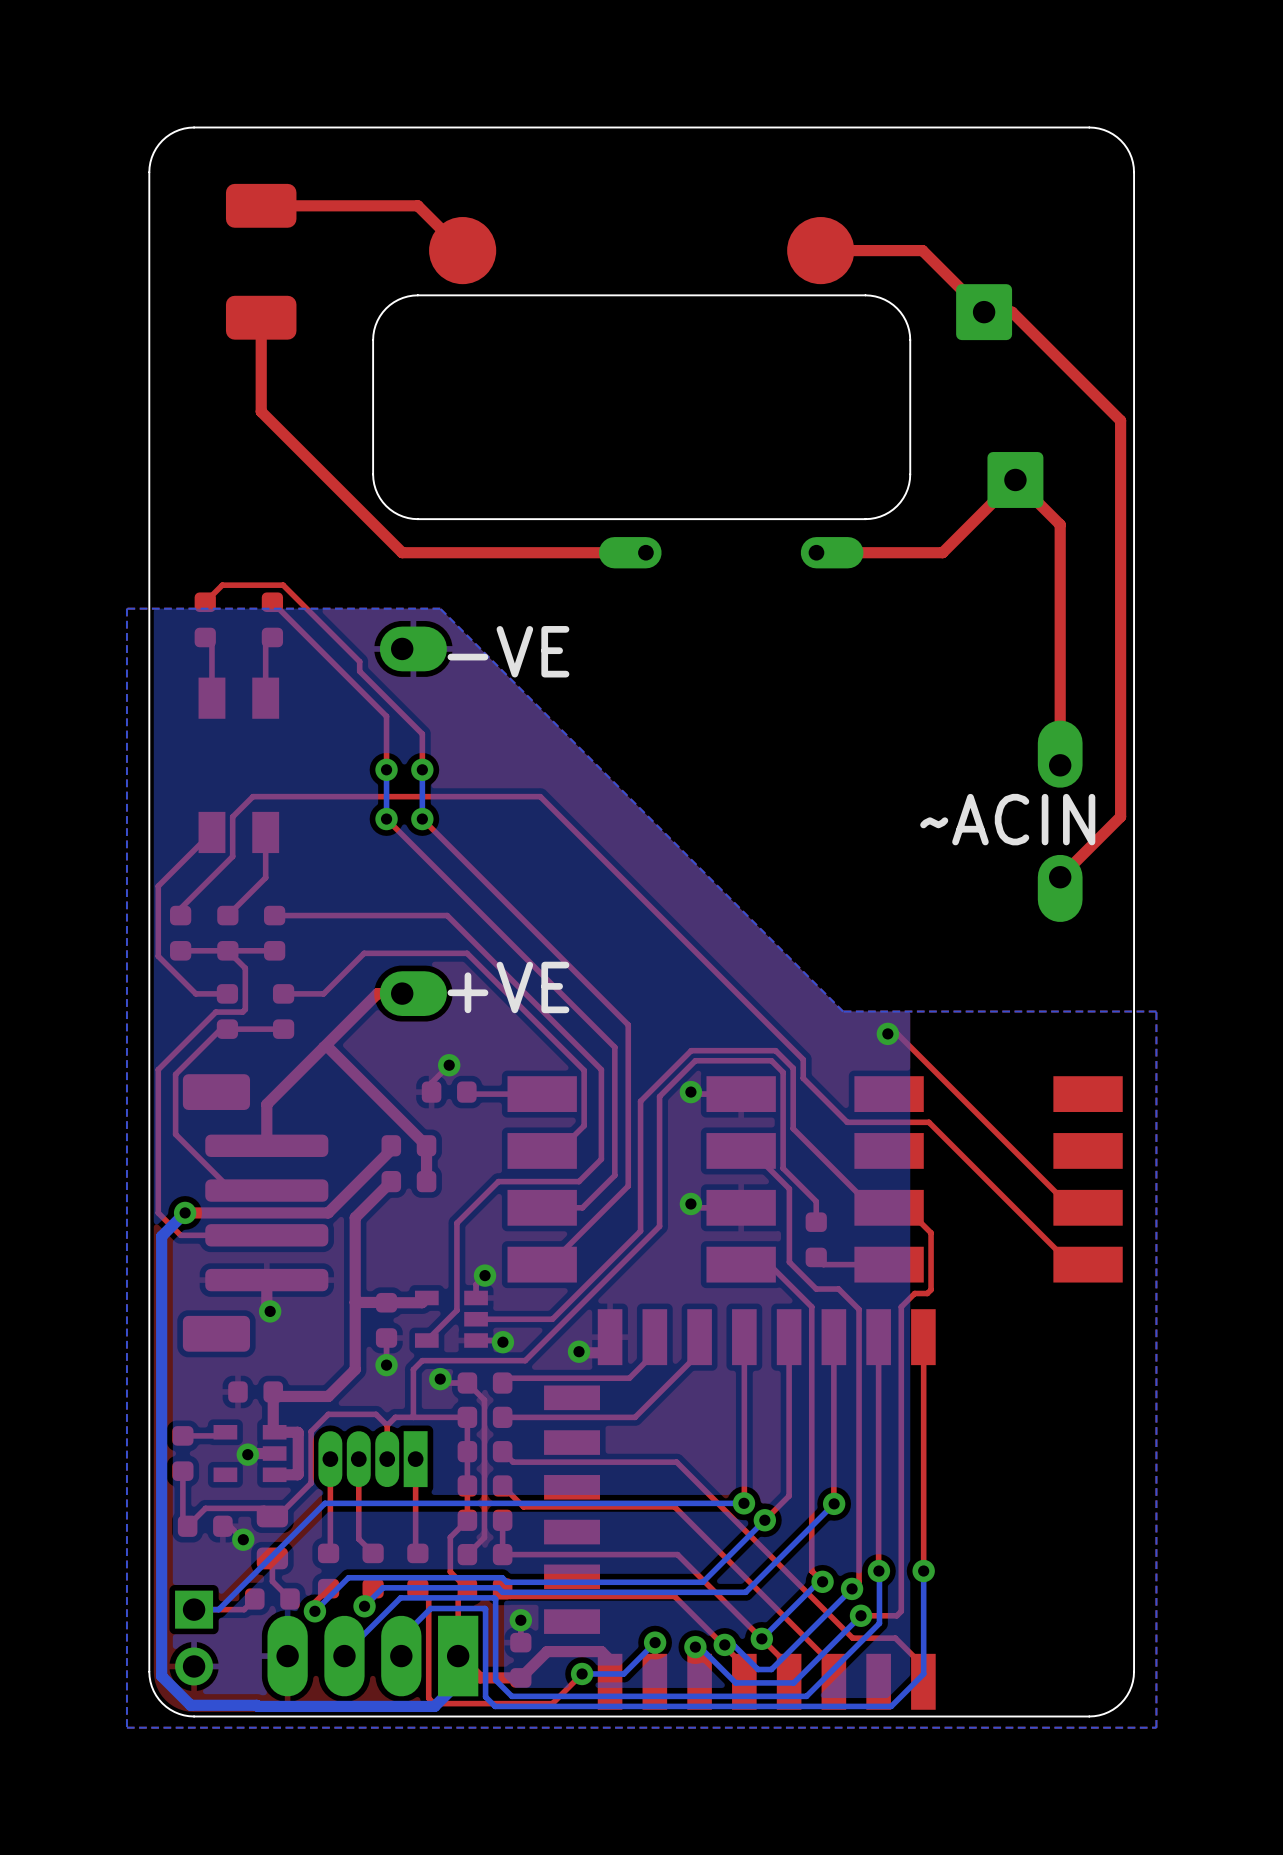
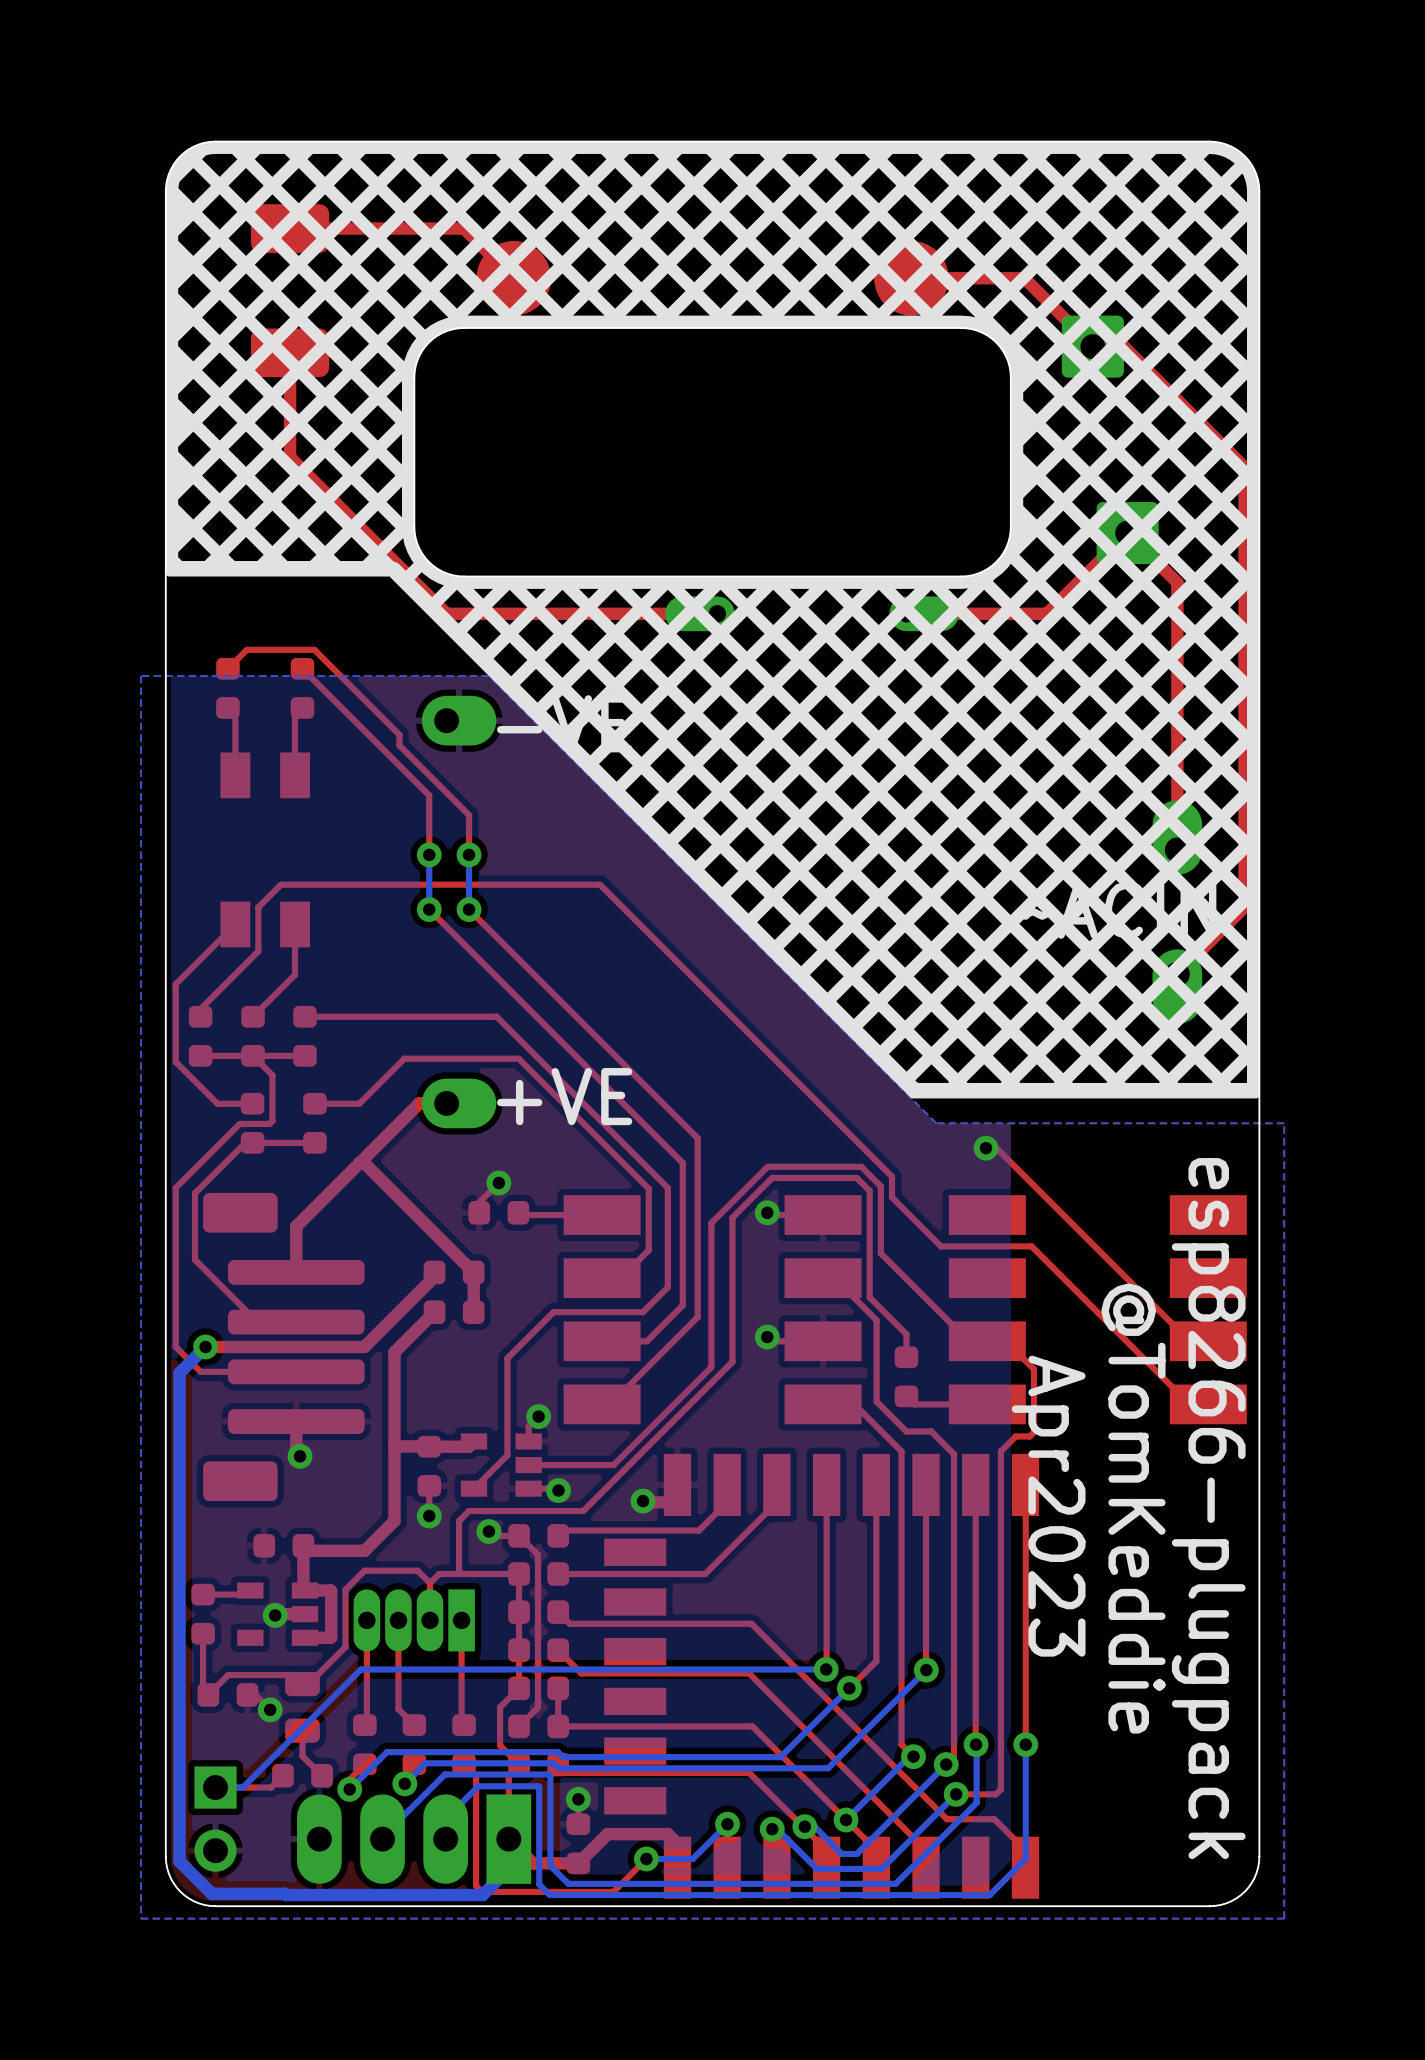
drawing: none -> [165, 141, 1260, 1099]
text: none -> Apr2023 (1048, 1506)
text: none -> @TomKeddie (1133, 1508)
text: none -> esp8266-plugpack (1208, 1508)

